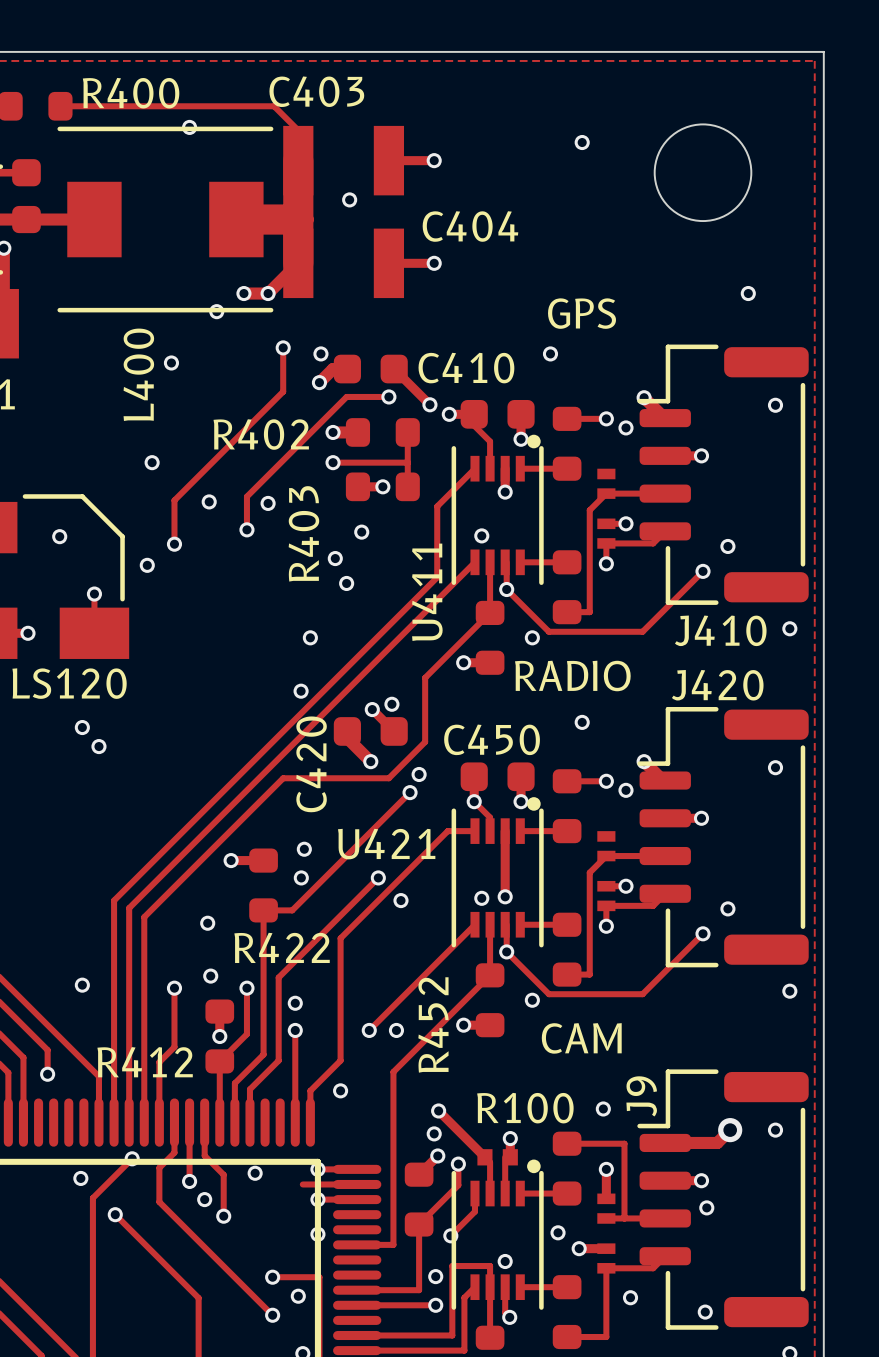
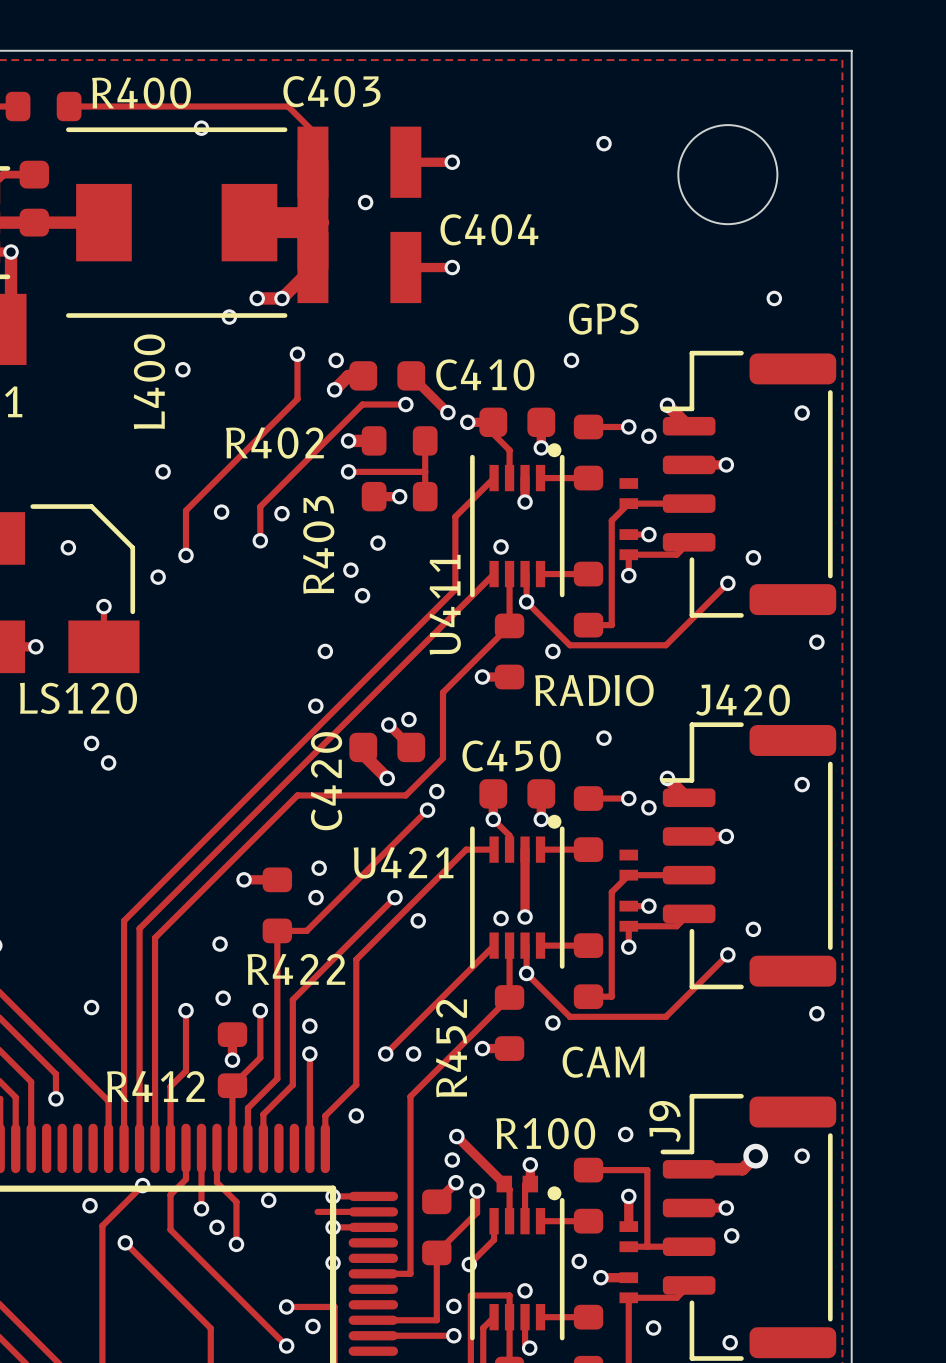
J410 name: J410 (720, 630) -> none

